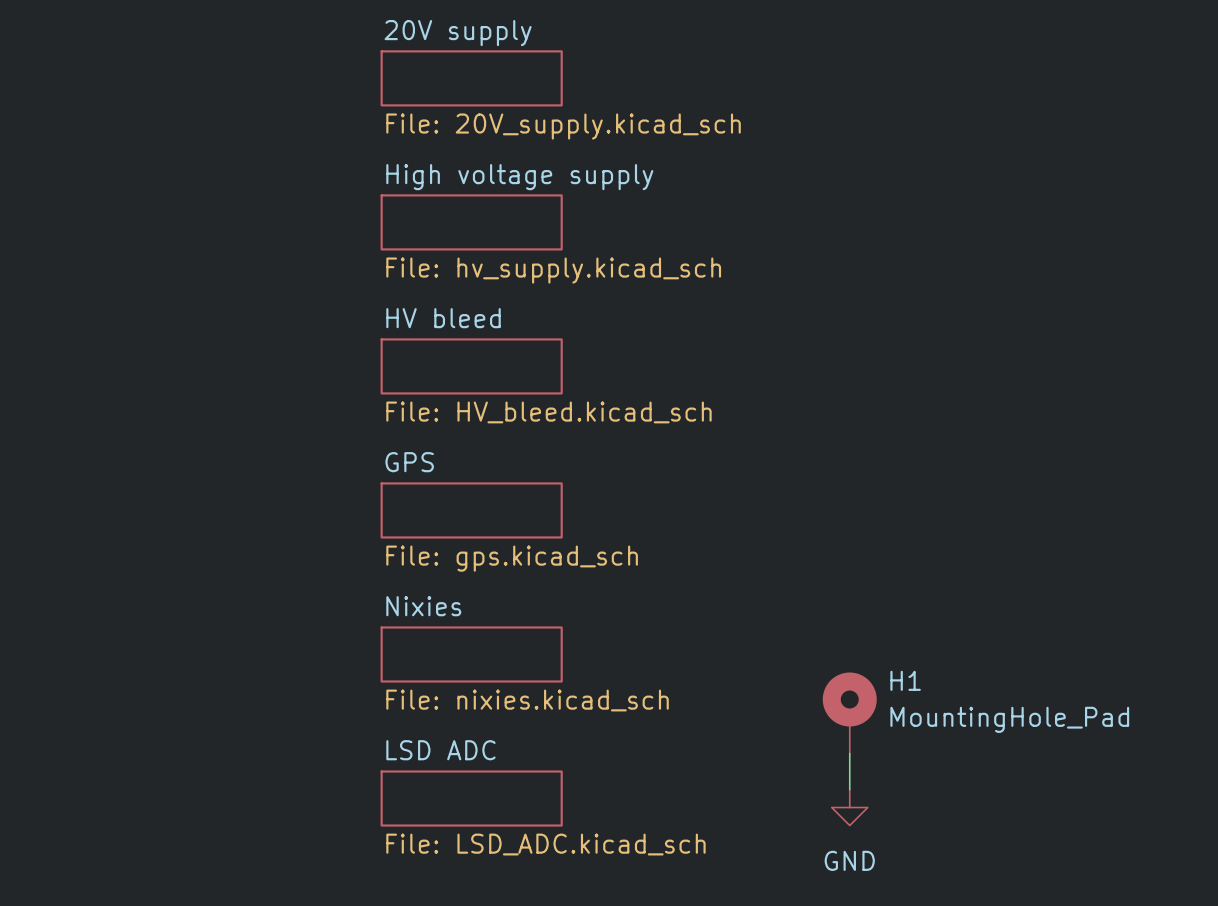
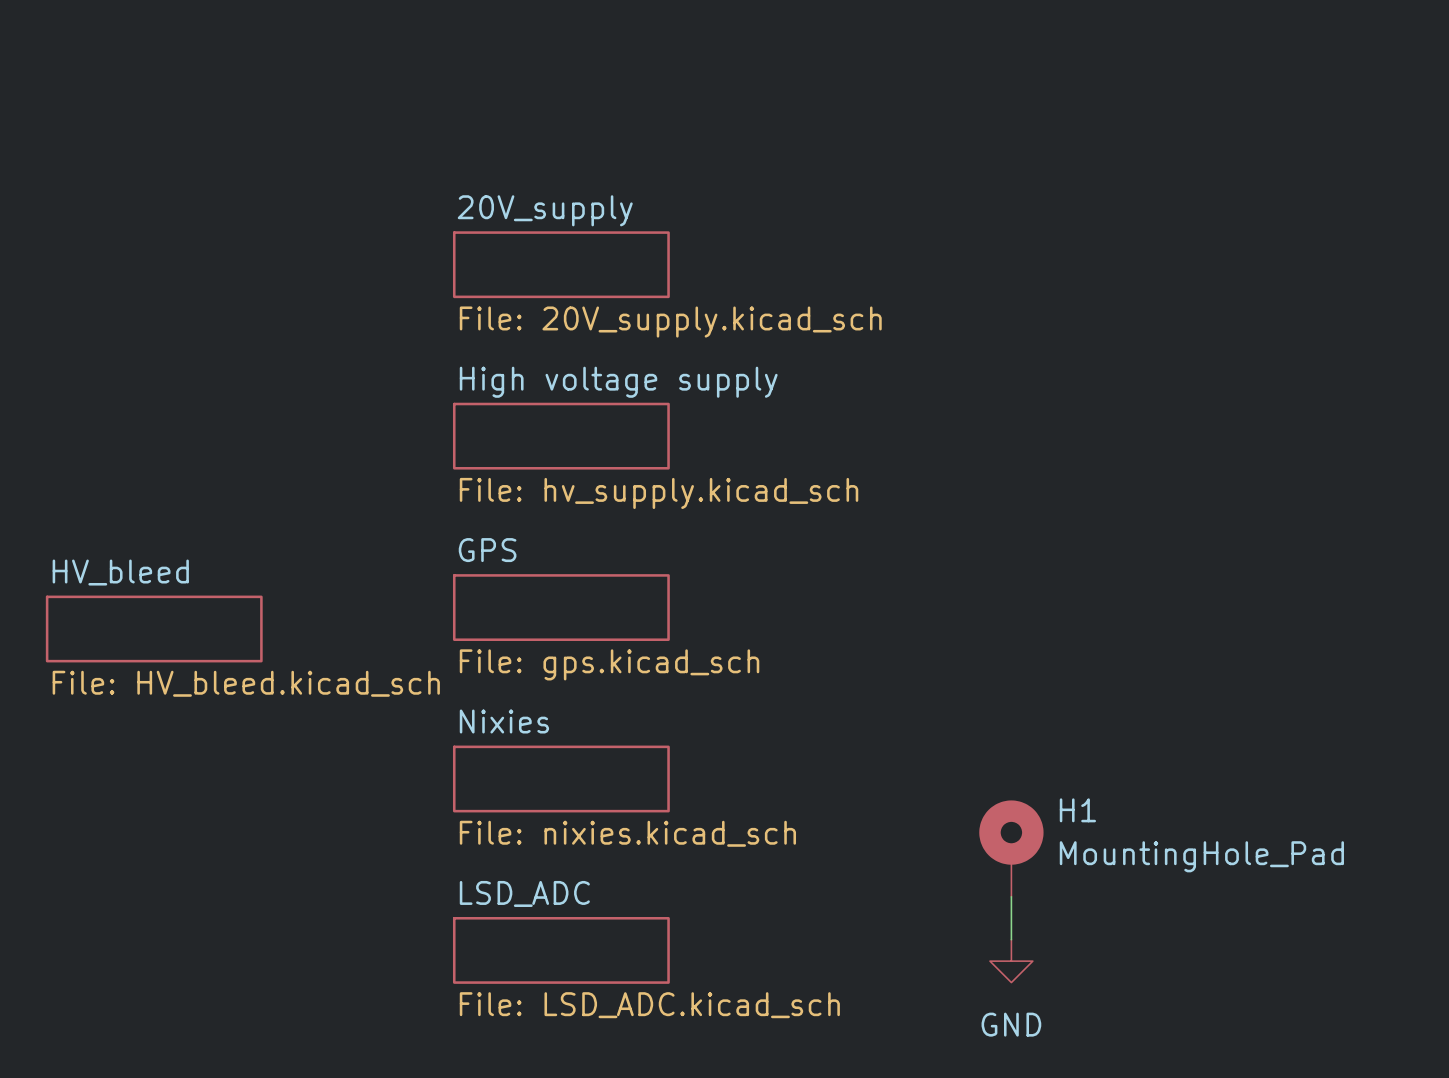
sheet 20V supply: File: 20V_supply.kicad_sch (471, 78) -> none
sheet High voltage supply name: High voltage supply (519, 177) -> 20V_supply (545, 210)
sheet High voltage supply value: File: hv_supply.kicad_sch (553, 270) -> File: 20V_supply.kicad_sch (670, 322)
sheet HV bleed name: HV bleed (443, 318) -> High voltage supply (618, 382)
sheet HV bleed value: File: HV_bleed.kicad_sch (548, 412) -> File: hv_supply.kicad_sch (659, 493)
sheet HV_bleed: none -> File: HV_bleed.kicad_sch (154, 629)
sheet LSD ADC name: LSD ADC (440, 750) -> LSD_ADC (524, 893)

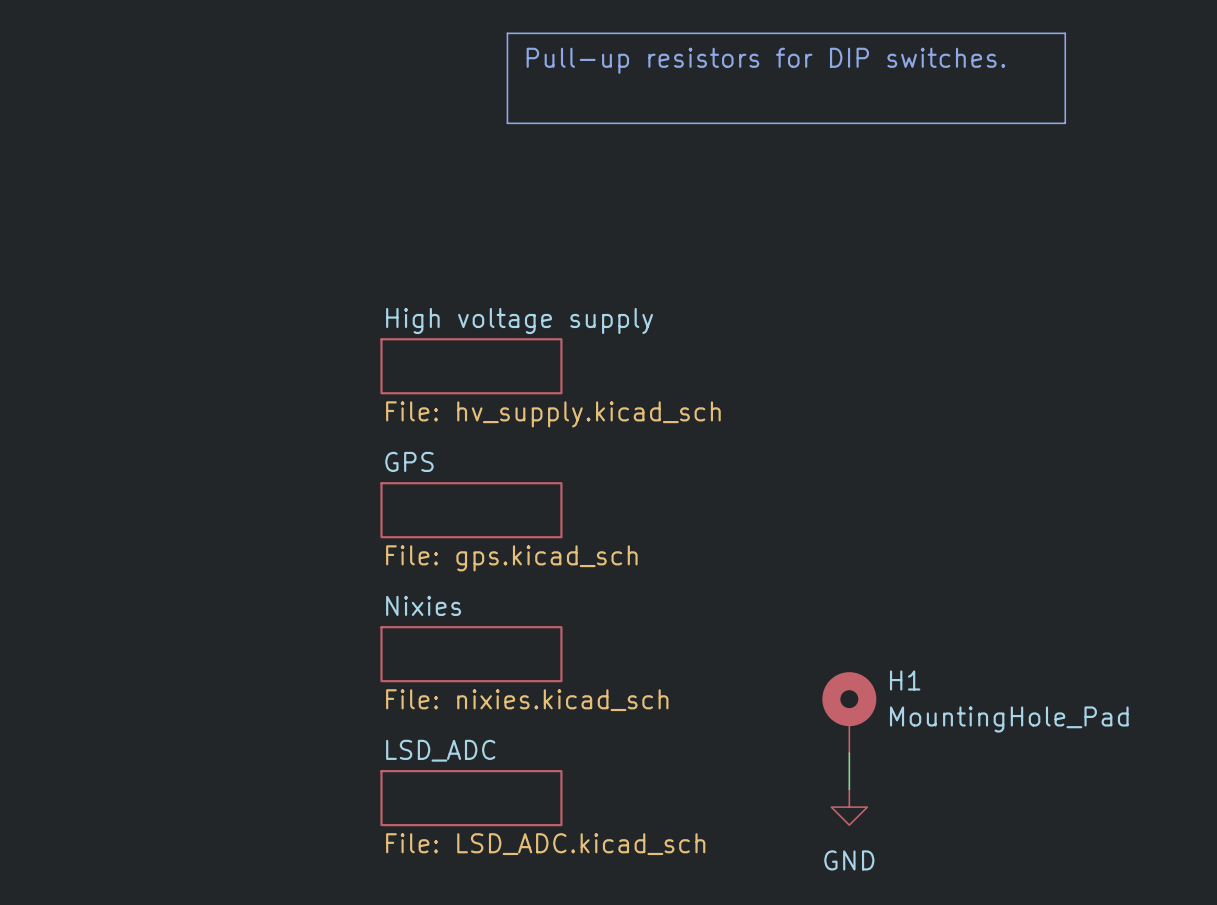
line: none -> (507, 33) (1065, 33) (1065, 123) (507, 123) (507, 33)
text: none -> Pull-up resistors for DIP switches. (765, 60)
sheet 20V_supply: File: 20V_supply.kicad_sch (561, 264) -> none
sheet HV_bleed: File: HV_bleed.kicad_sch (154, 629) -> none

